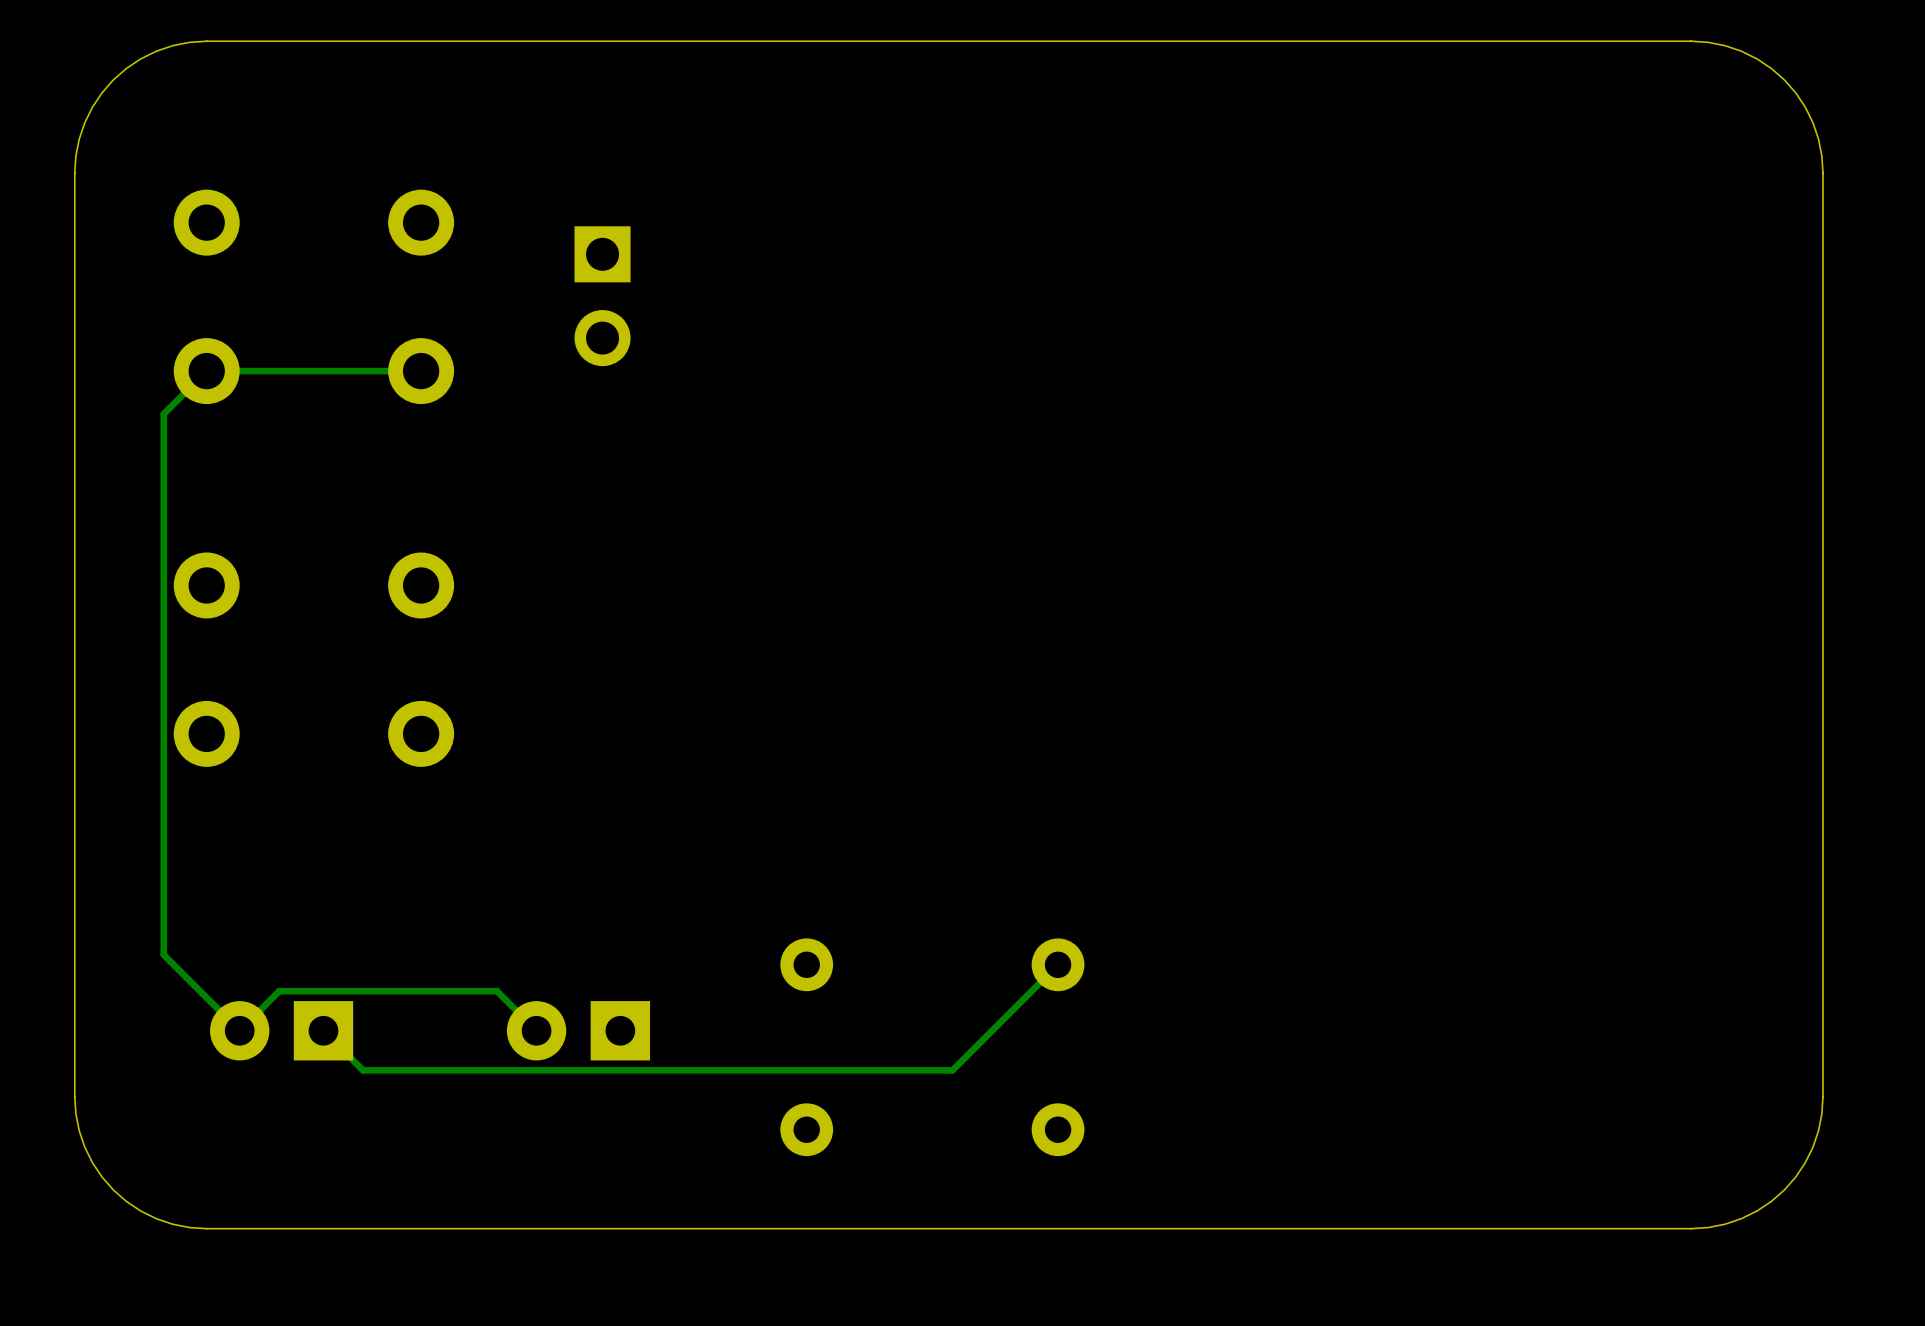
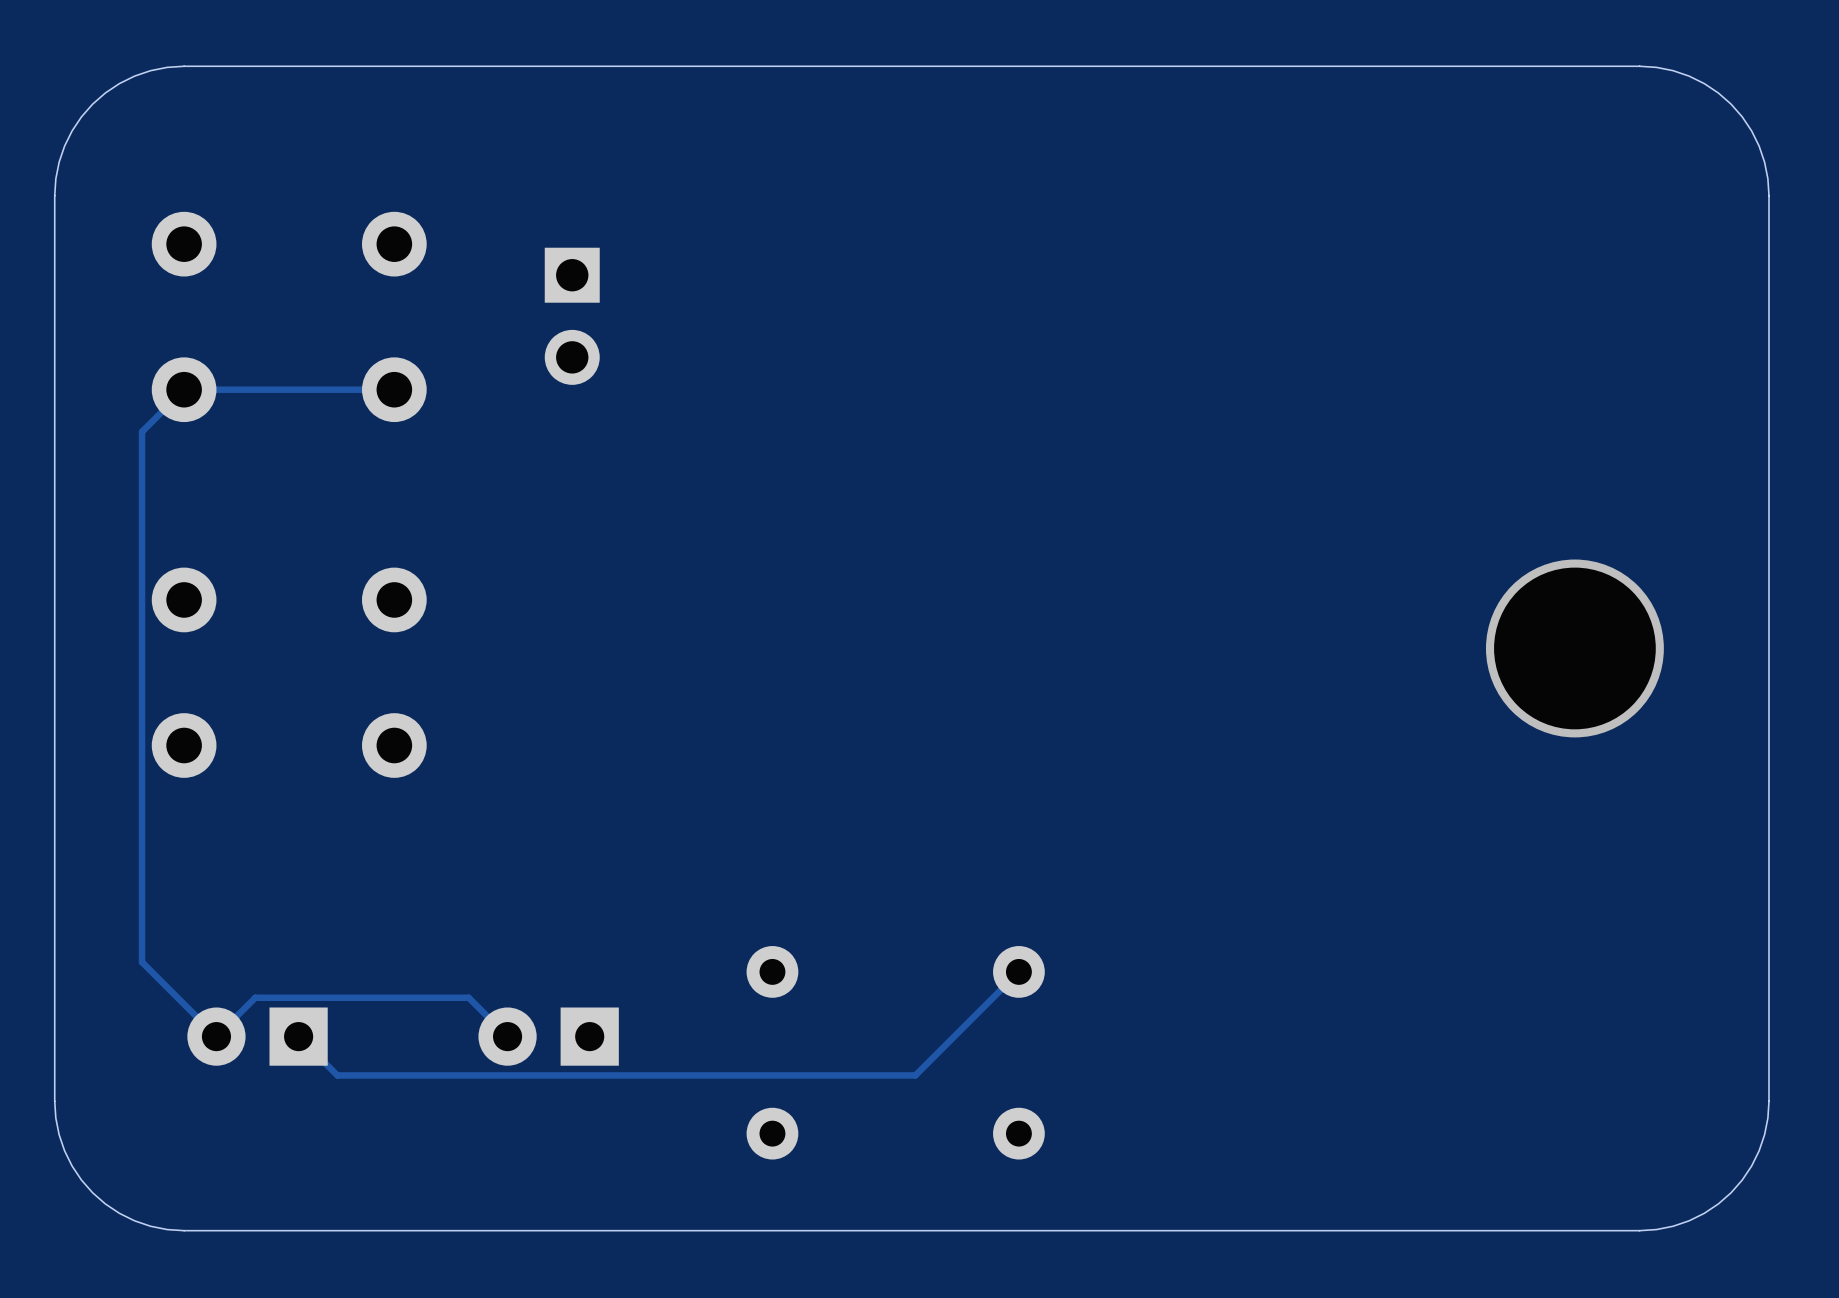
via: none -> (1574, 648)

